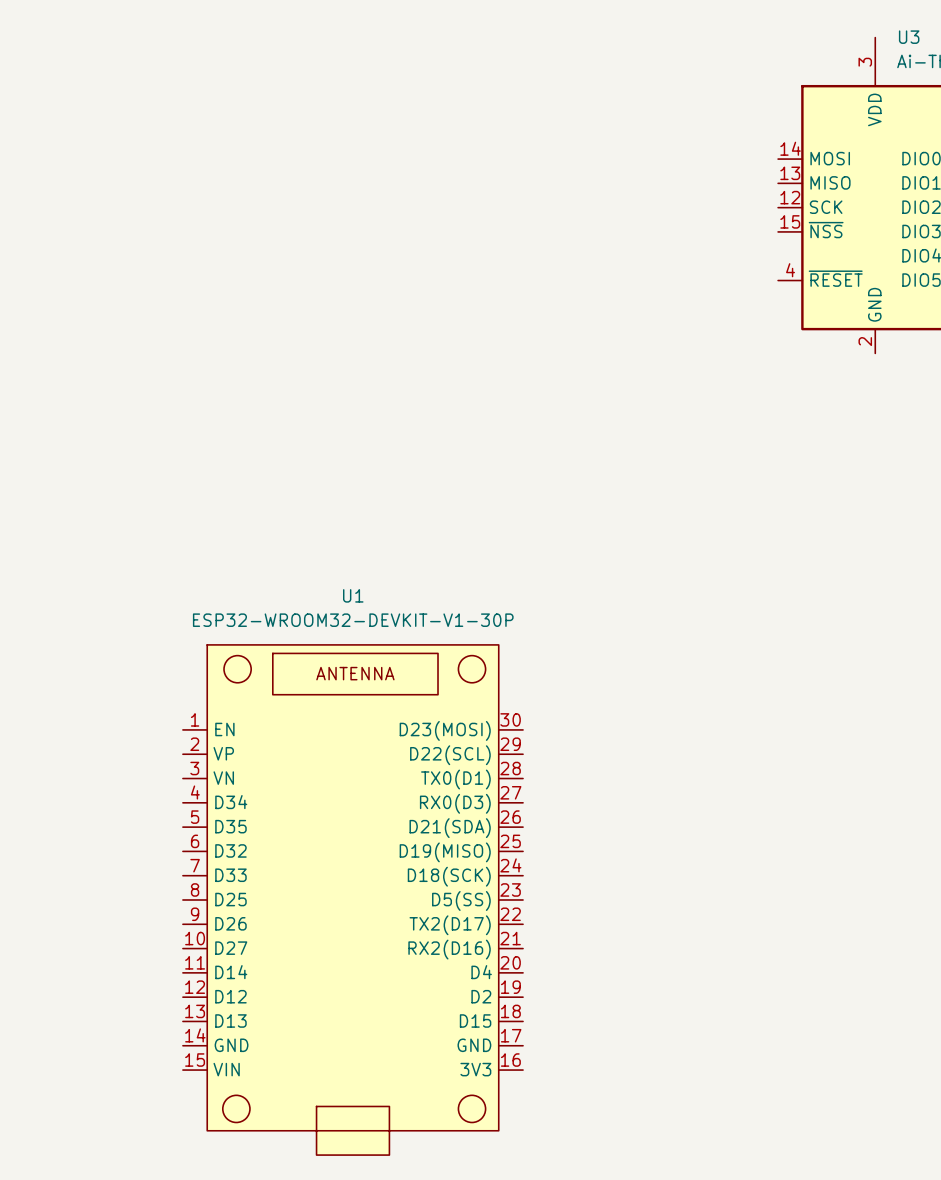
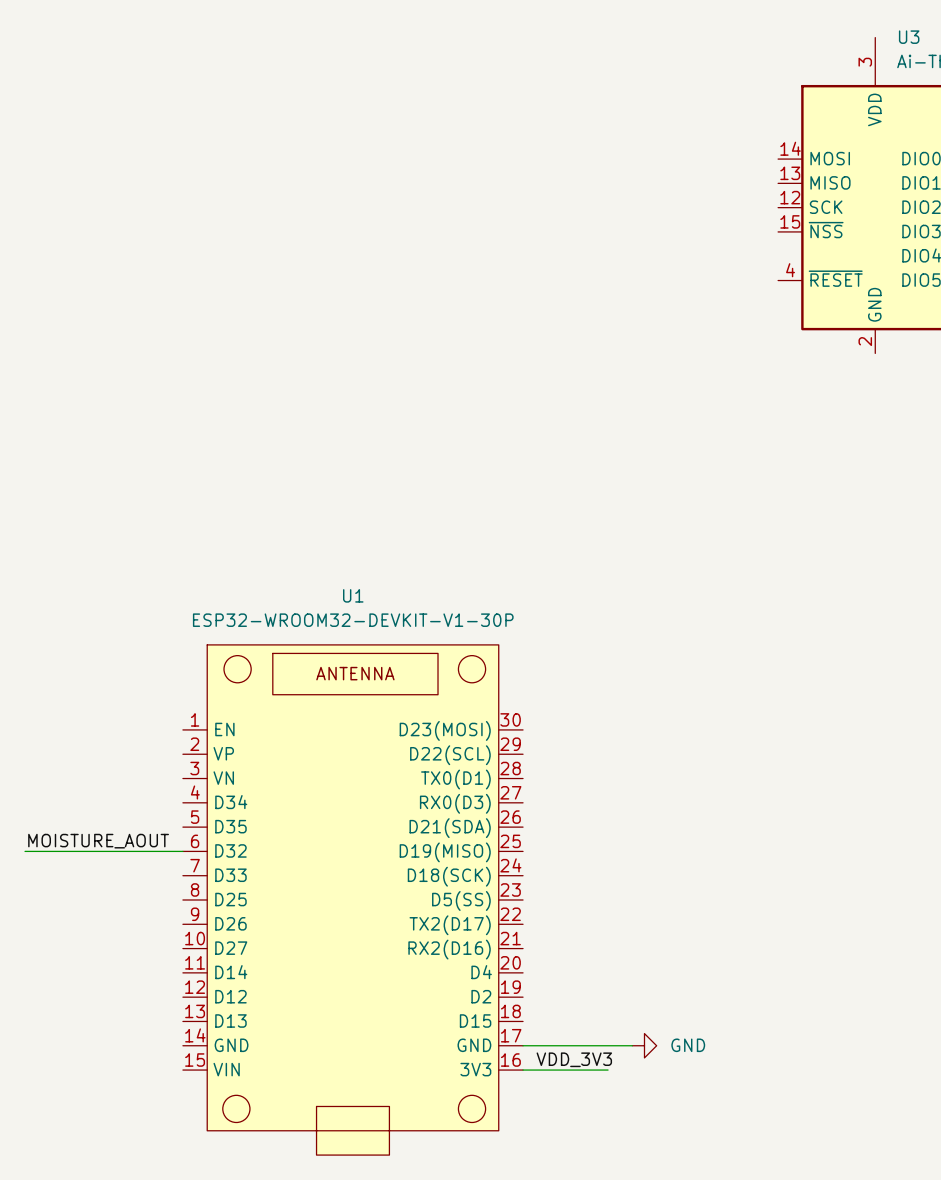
label: none -> MOISTURE_AOUT (98, 841)
wire: none -> (25, 851) (182, 851)
wire: none -> (523, 1045) (632, 1045)
power symbol: none -> GND (644, 1045)
label: none -> VDD_3V3 (574, 1059)
wire: none -> (523, 1070) (608, 1070)

